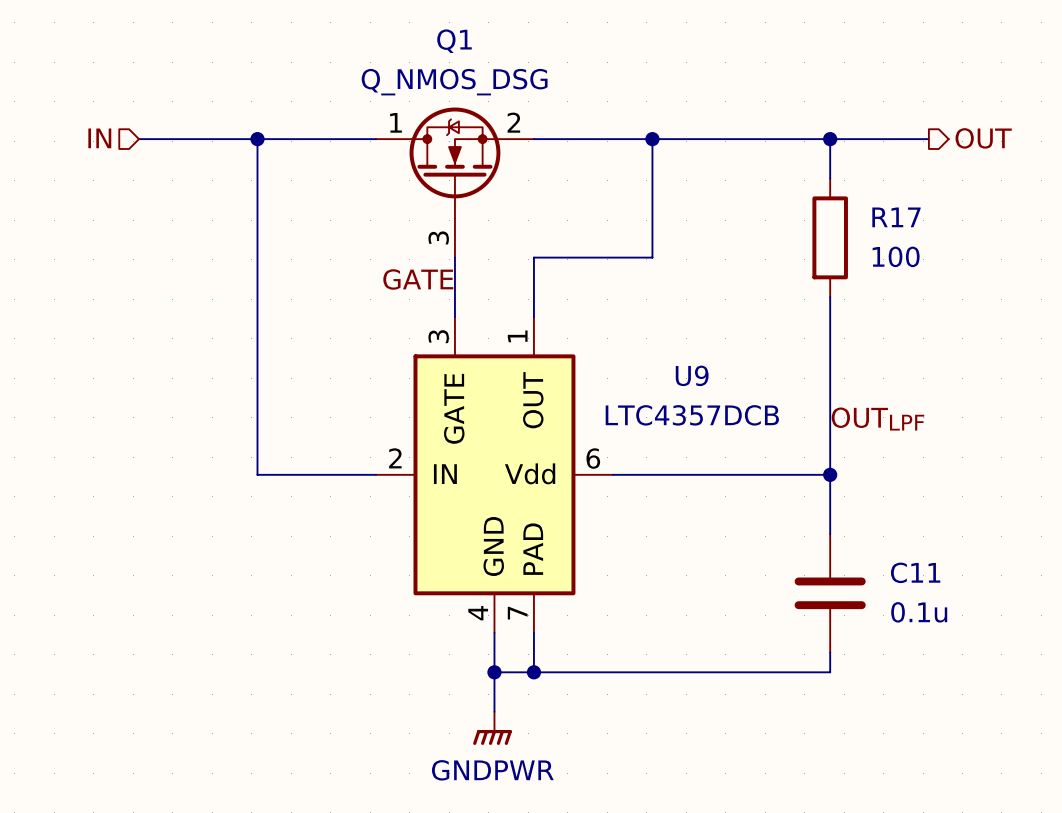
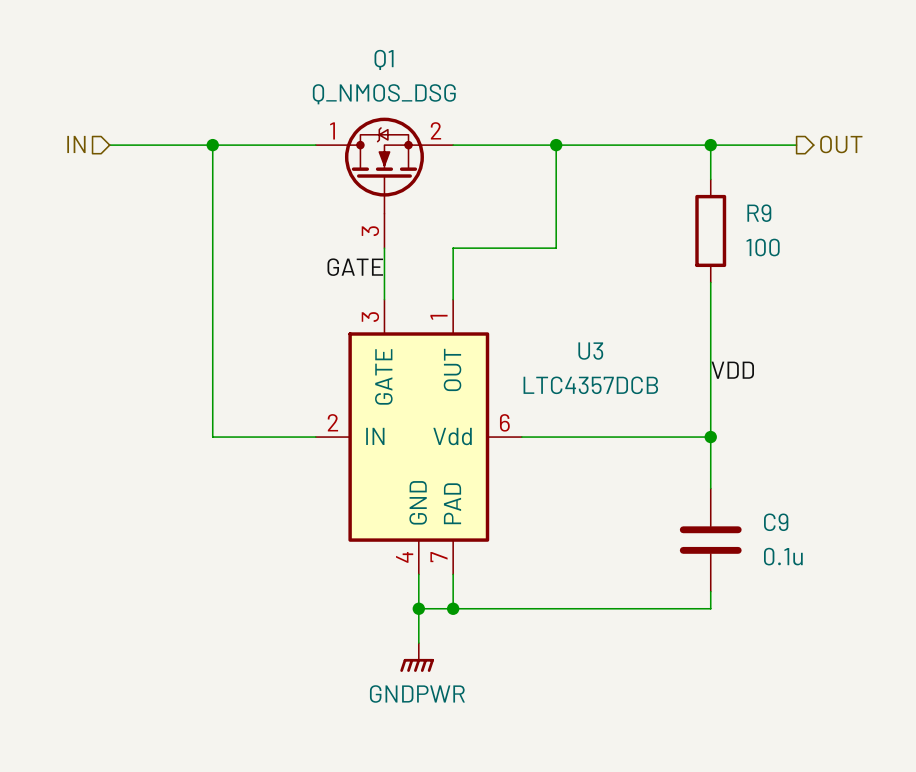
R17 name: R17 (896, 217) -> R9 (759, 213)
U9 name: U9 (692, 375) -> U3 (590, 351)
label: none -> VDD (732, 370)
label: OUTLPF (877, 419) -> none
C11 name: C11 (915, 572) -> C9 (776, 522)

